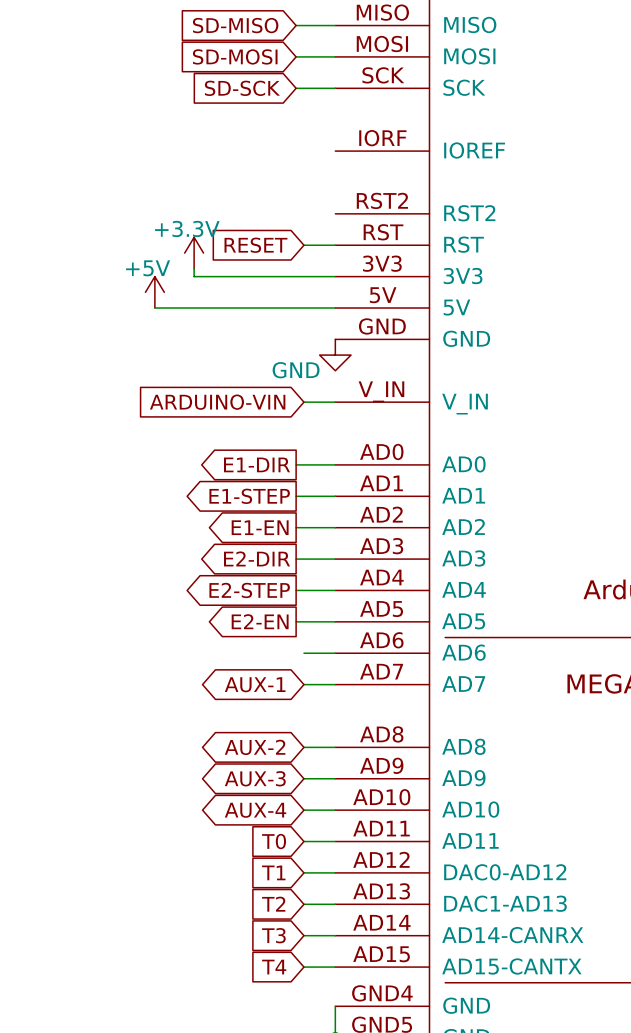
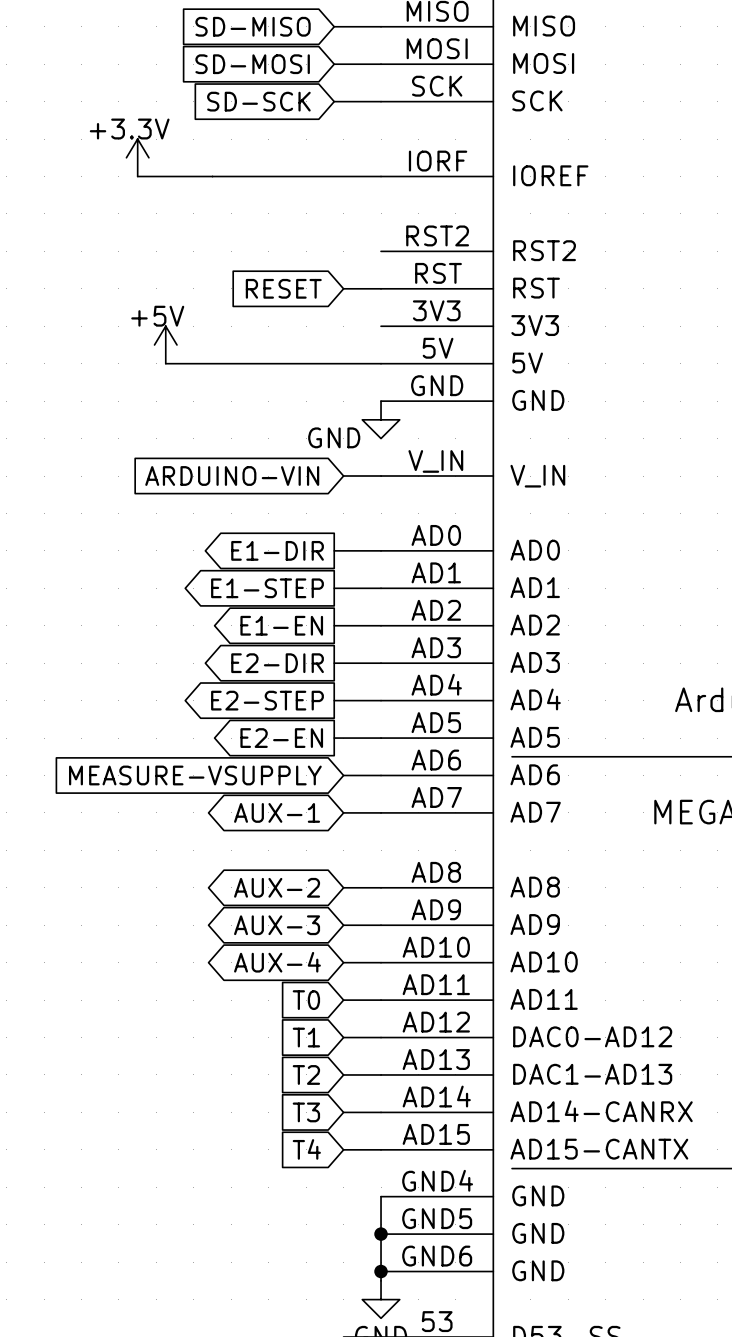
wire: none -> (137, 176) (381, 176)
power symbol position: +3.3V (194, 253) -> +3.3V (137, 157)
wire: (194, 268) (194, 276) (335, 276) -> none
global label: none -> MEASURE-VSUPPLY (195, 775)

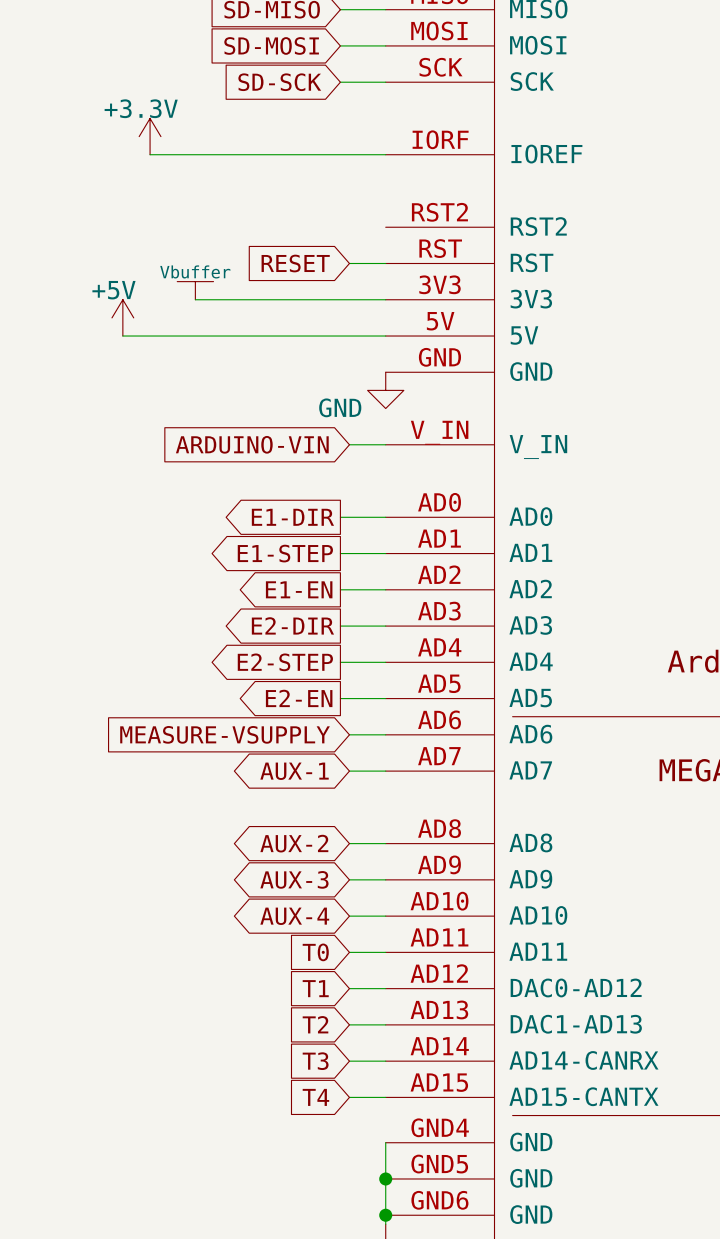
power symbol: none -> Vbuffer (195, 290)
wire: none -> (195, 299) (385, 299)
power symbol position: +5V (165, 344) -> +5V (122, 317)
wire: none -> (122, 336) (177, 336)

